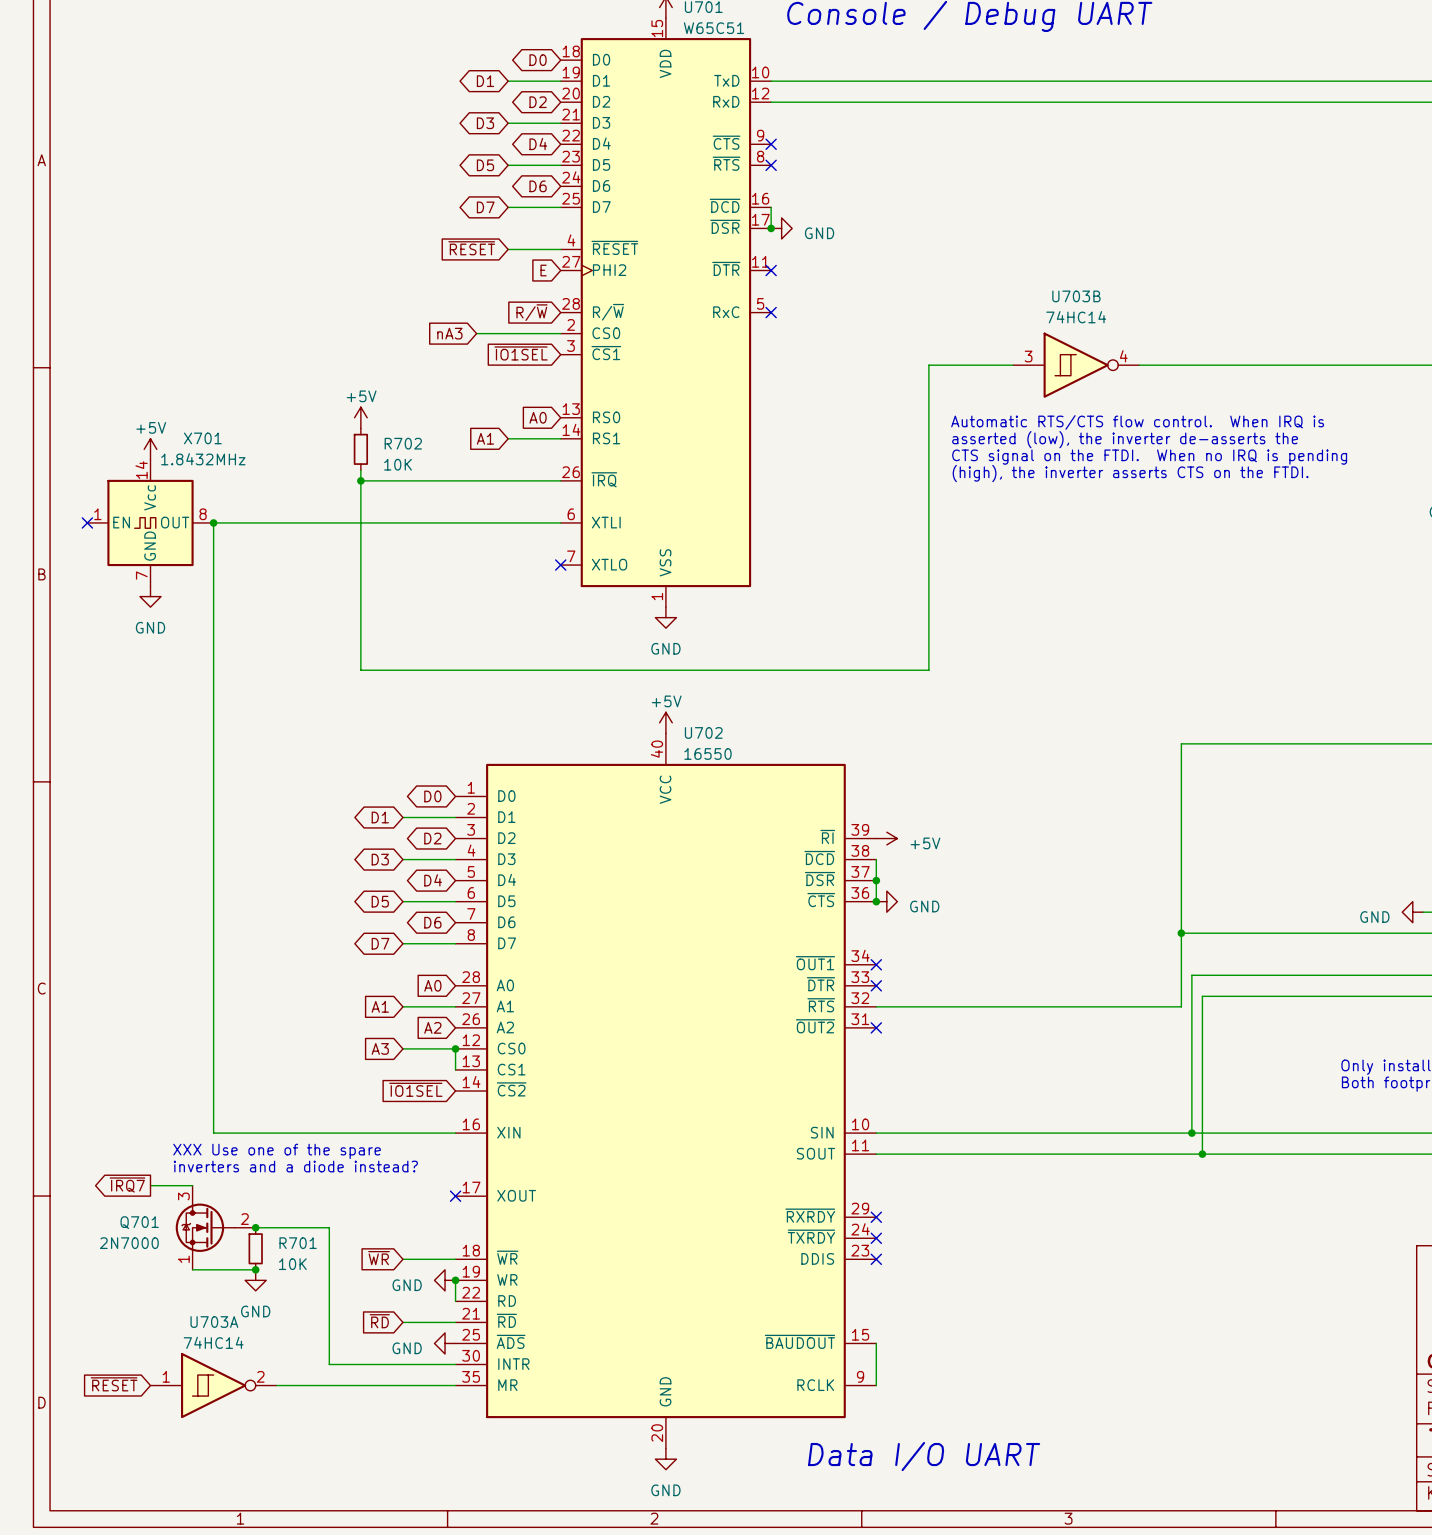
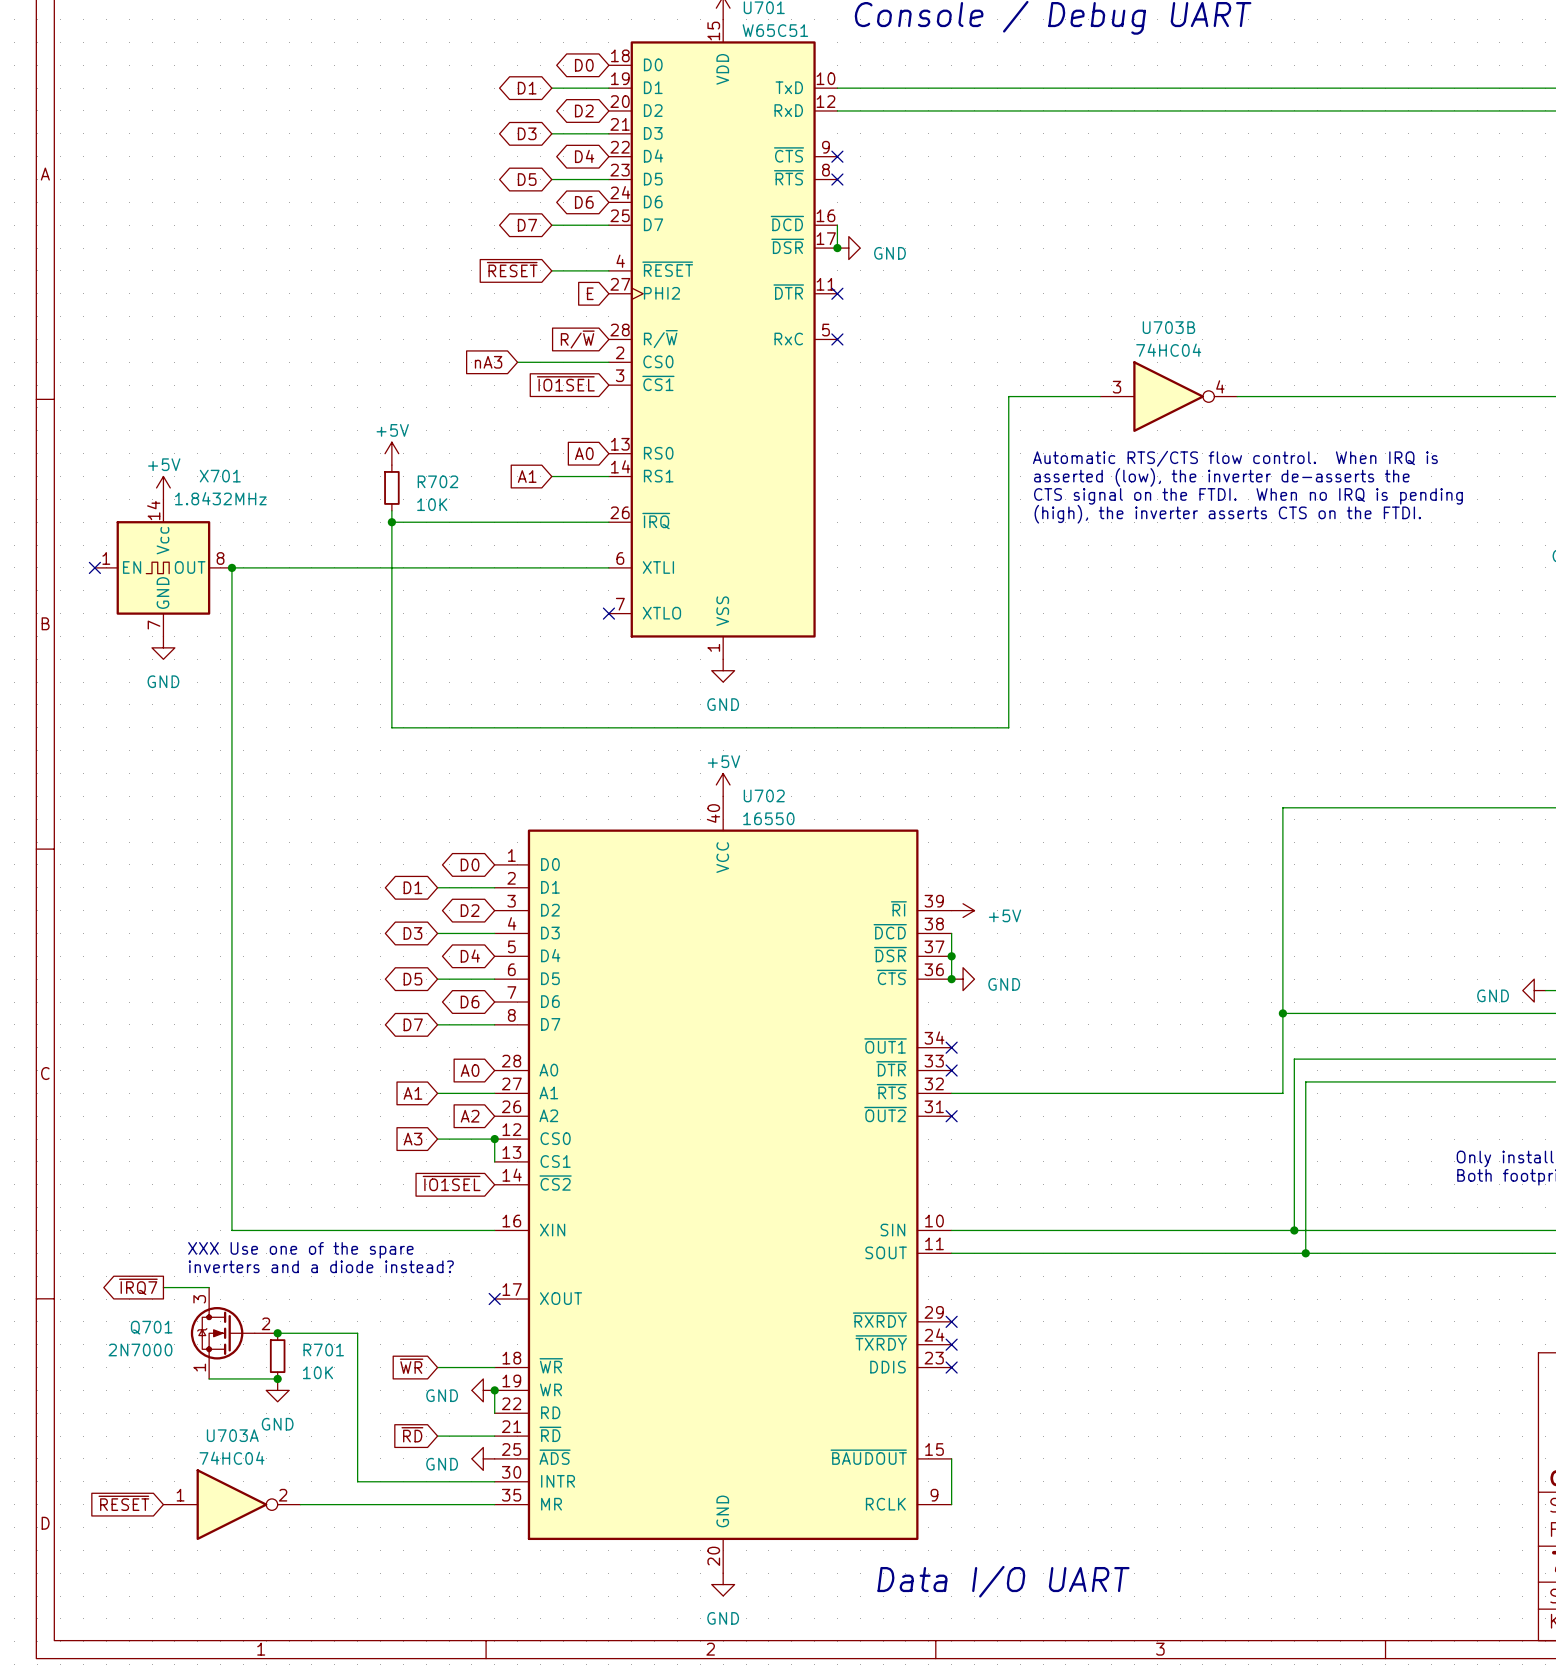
U703B value: 74HC14 (1076, 317) -> 74HC04 (1168, 350)
U703B symbol: [1013, 332, 1140, 398] -> [1100, 361, 1238, 432]
U703A value: 74HC14 (213, 1342) -> 74HC04 (231, 1458)
U703A symbol: [150, 1352, 277, 1419] -> [163, 1469, 301, 1541]

